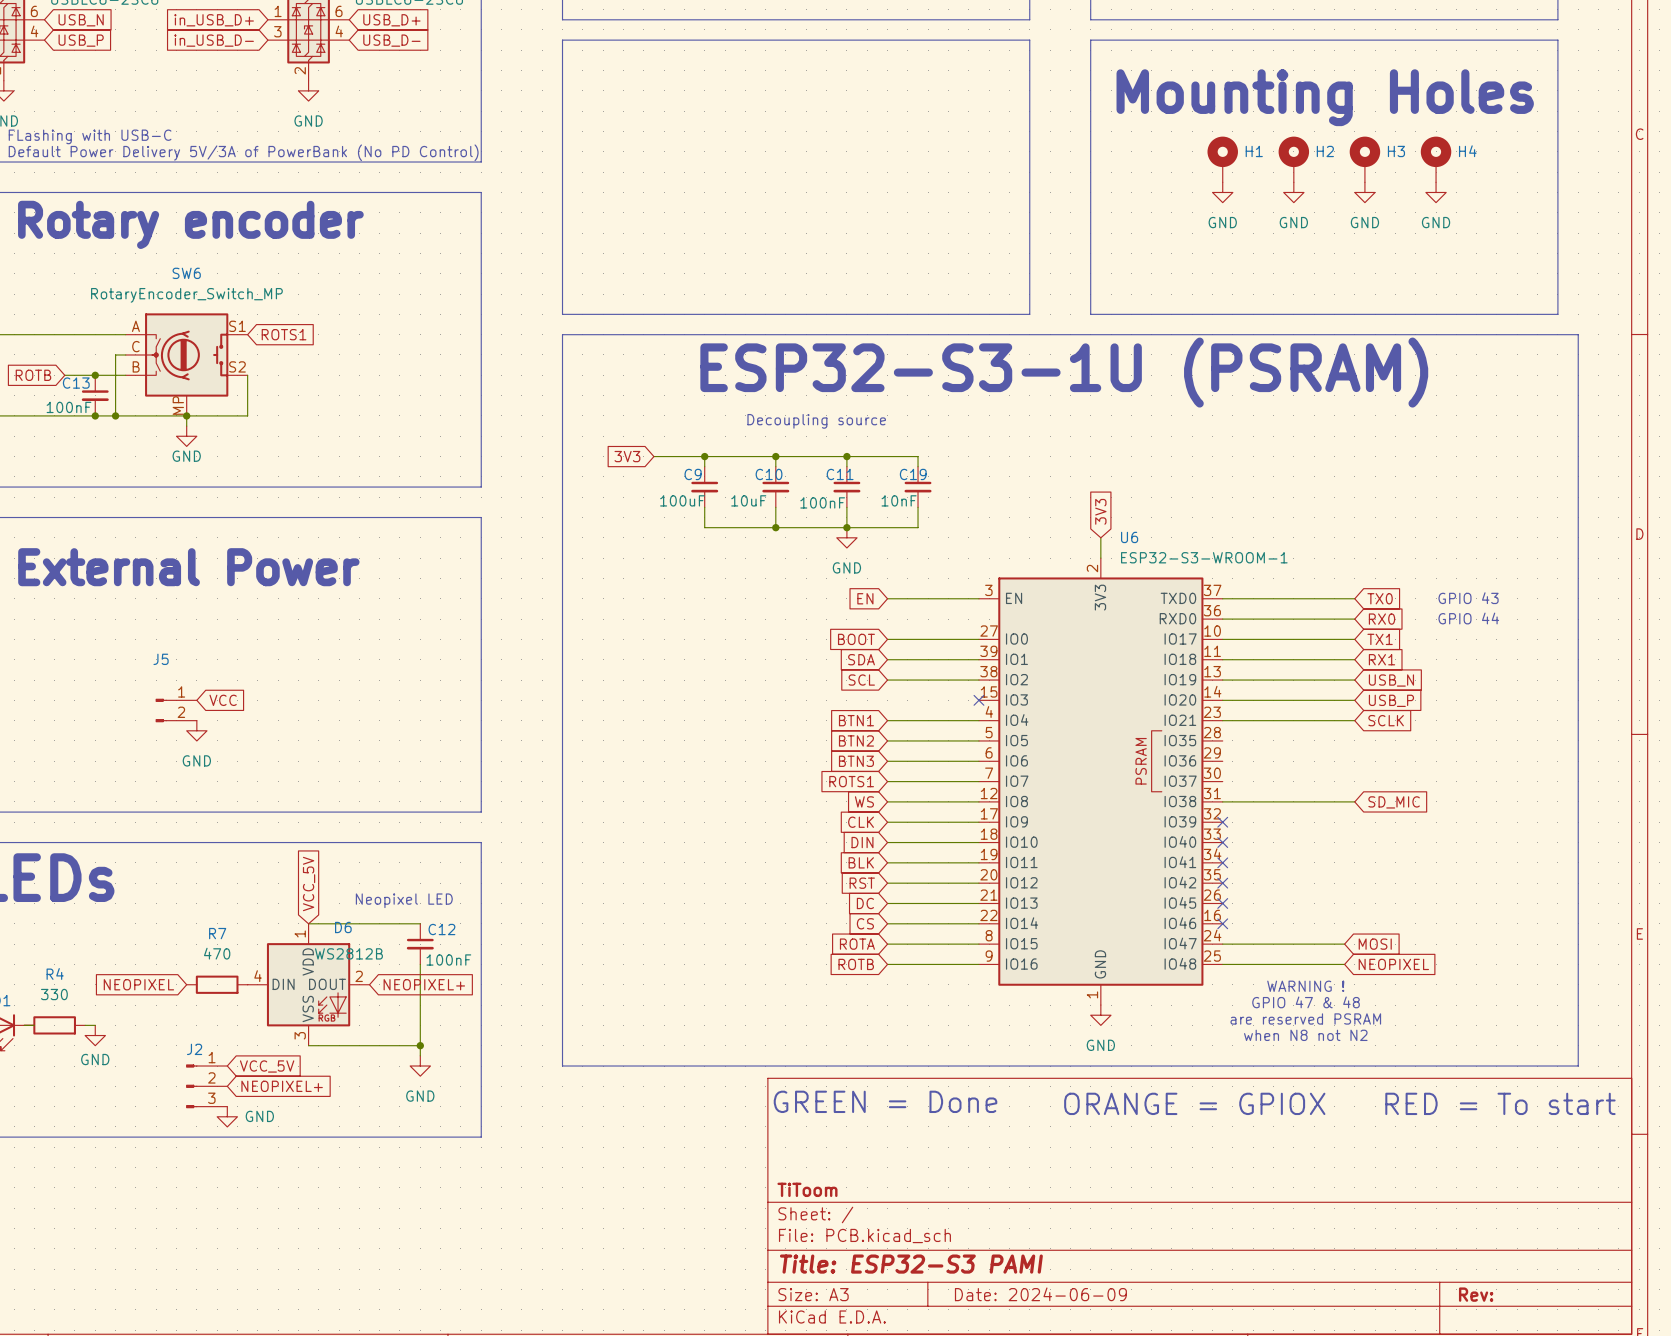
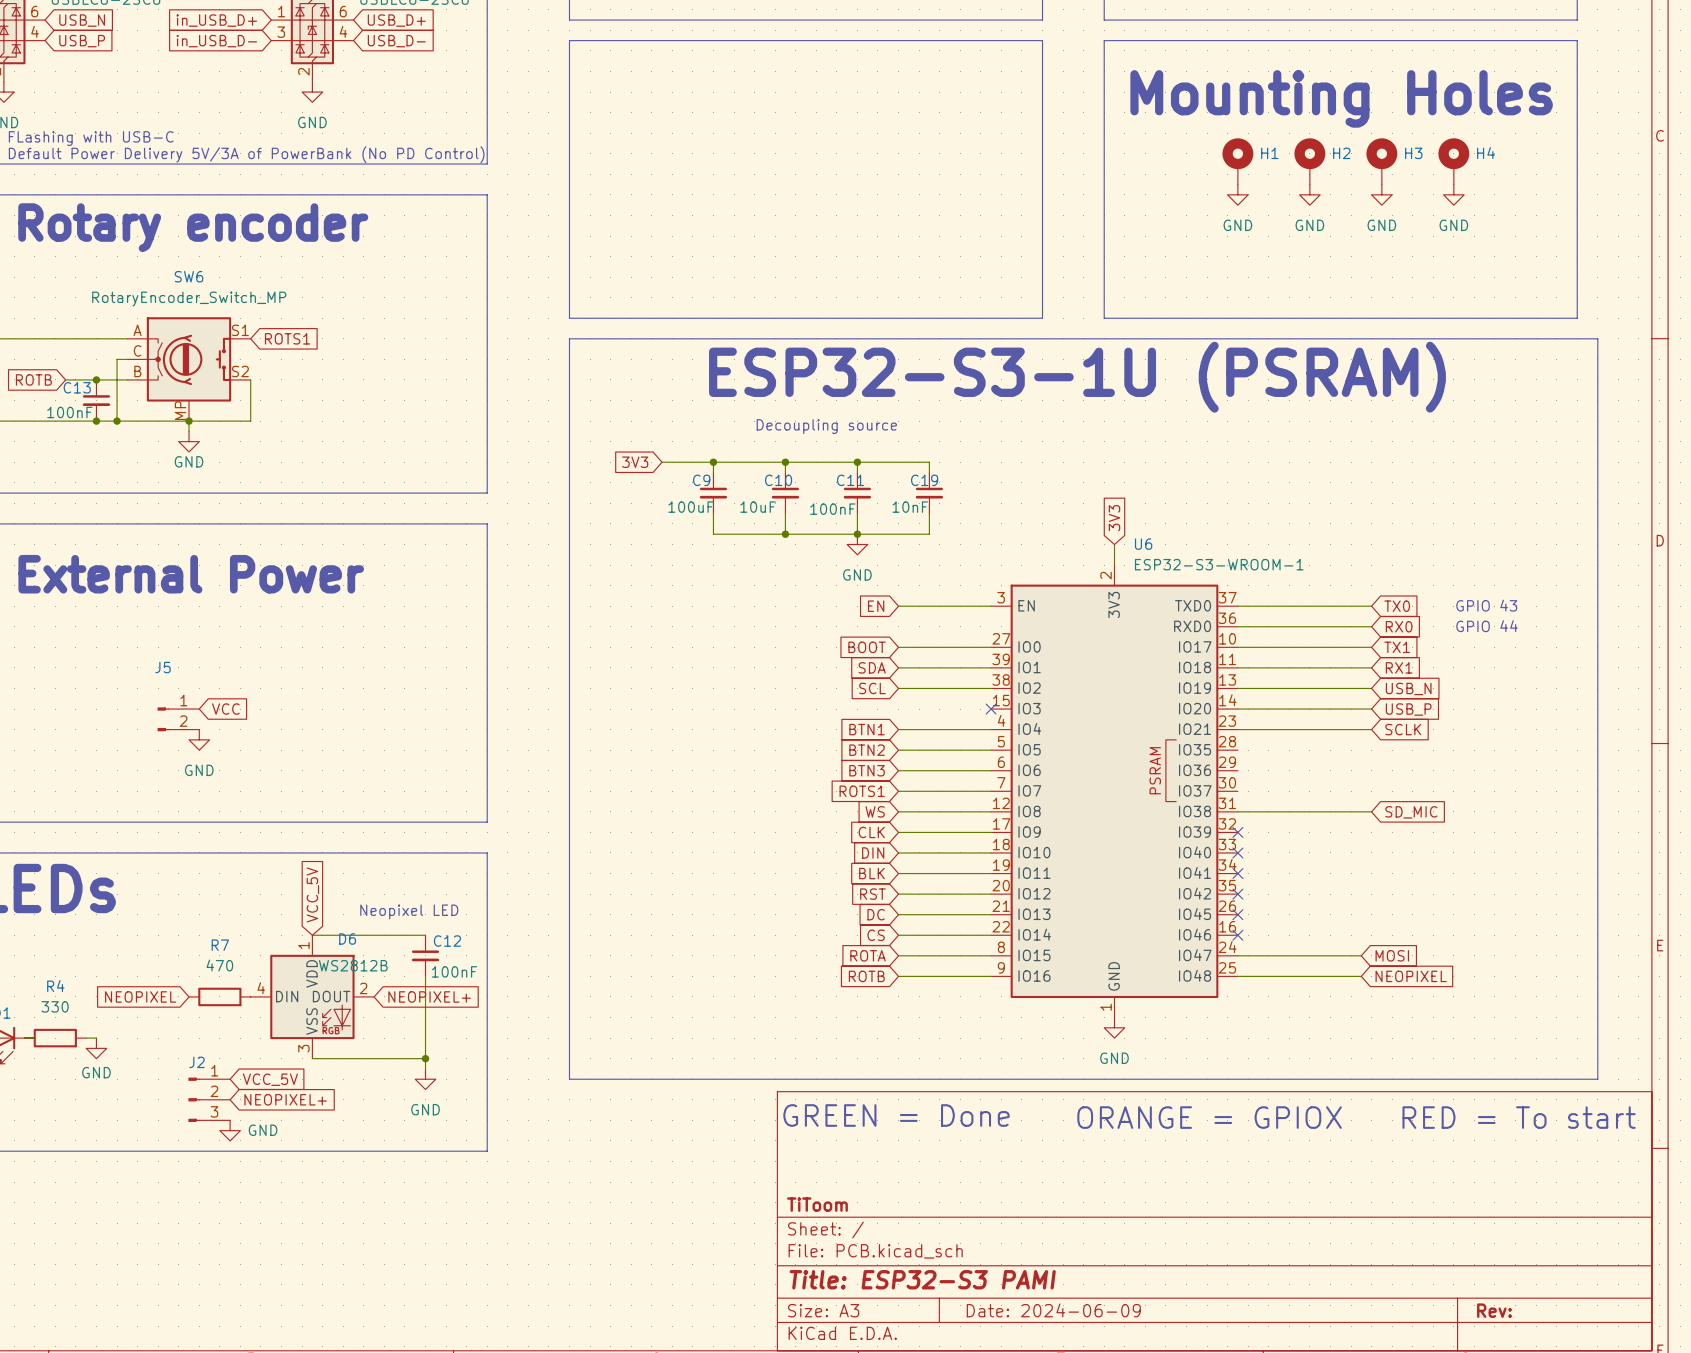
text: WARNING ! (1305, 986) -> none
text: GPIO 47 & 48 (1306, 1002) -> none
text: are reserved PSRAM (1305, 1018) -> none
text: when N8 not N2 (1305, 1035) -> none

